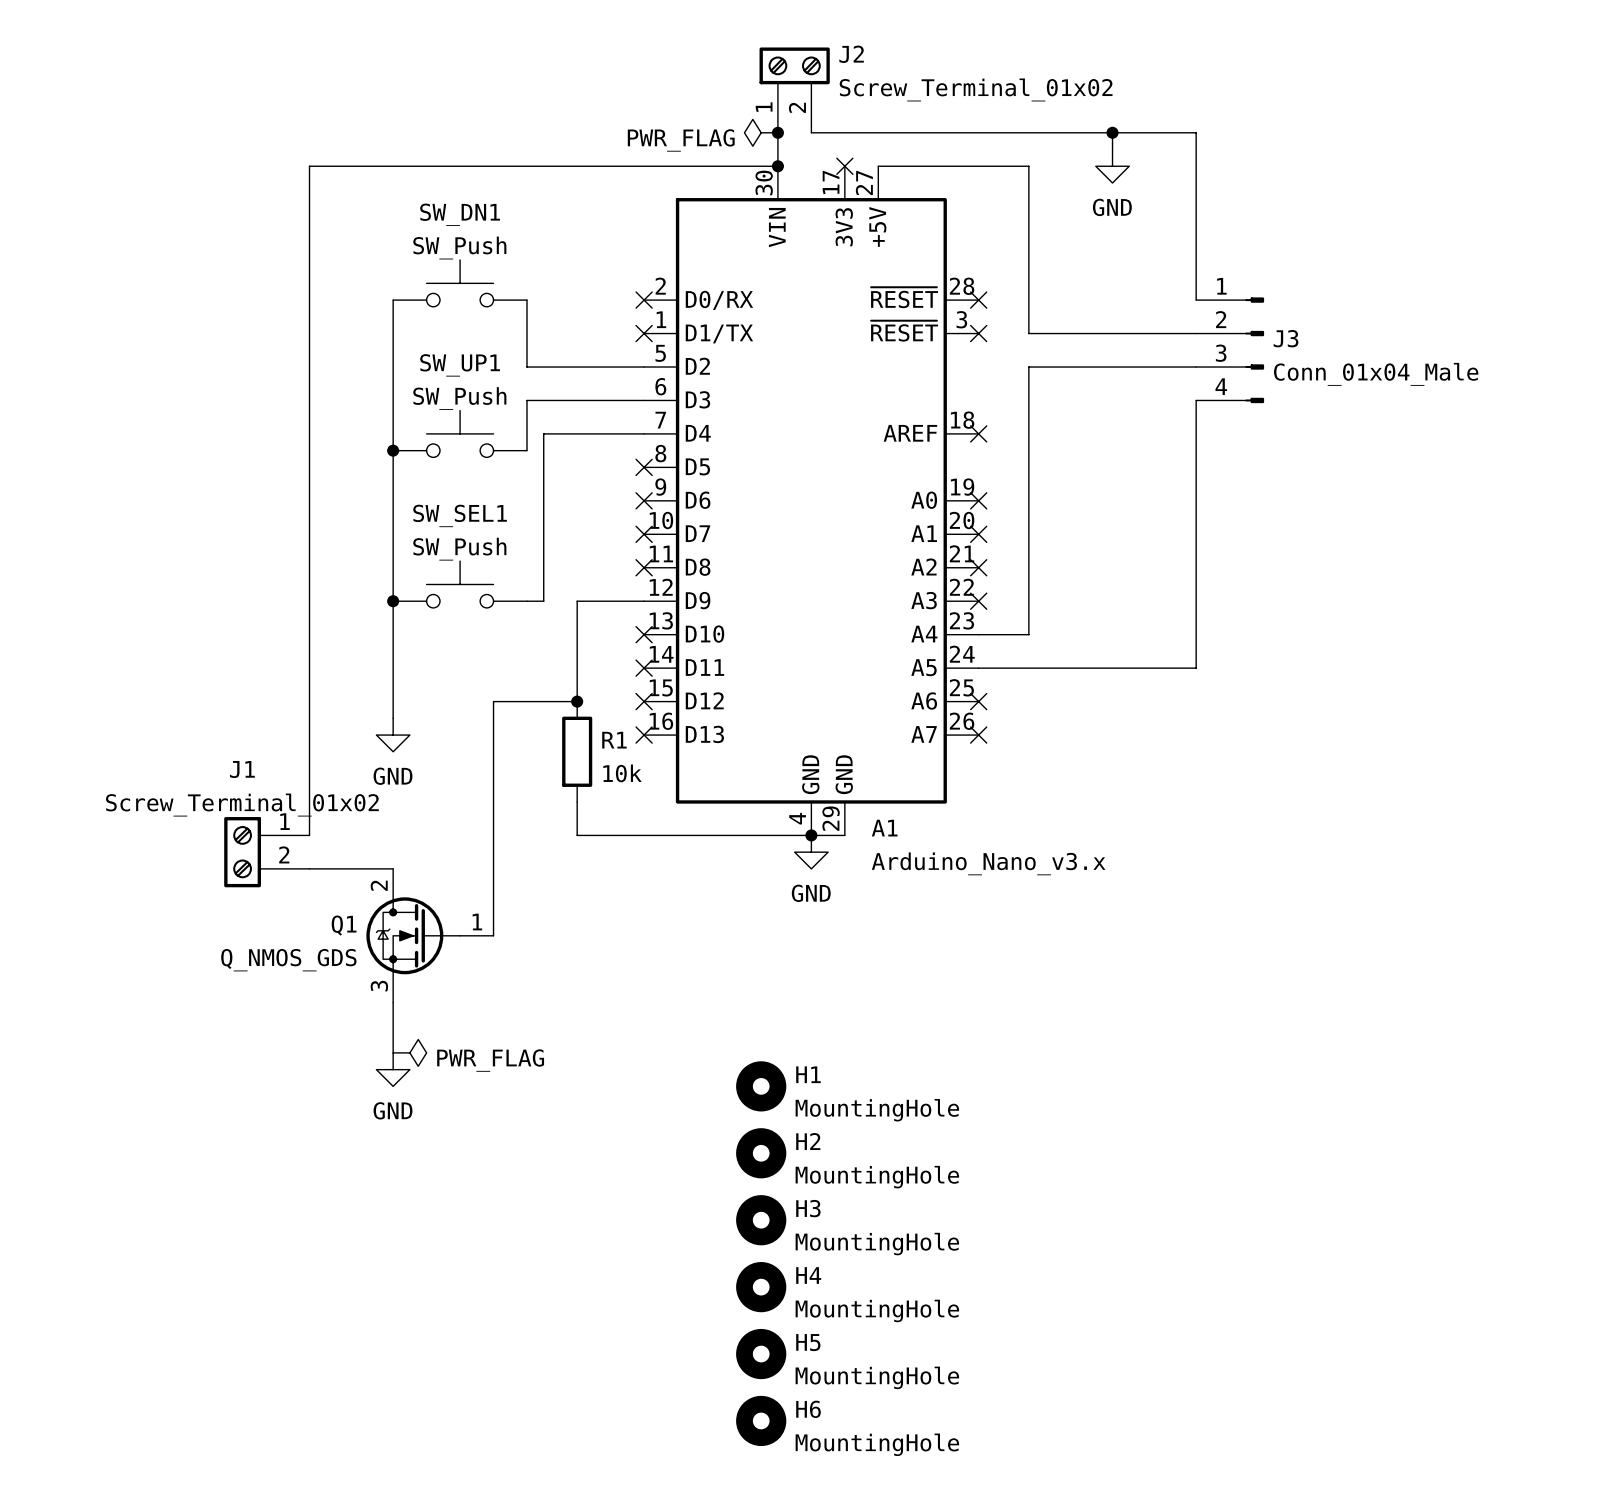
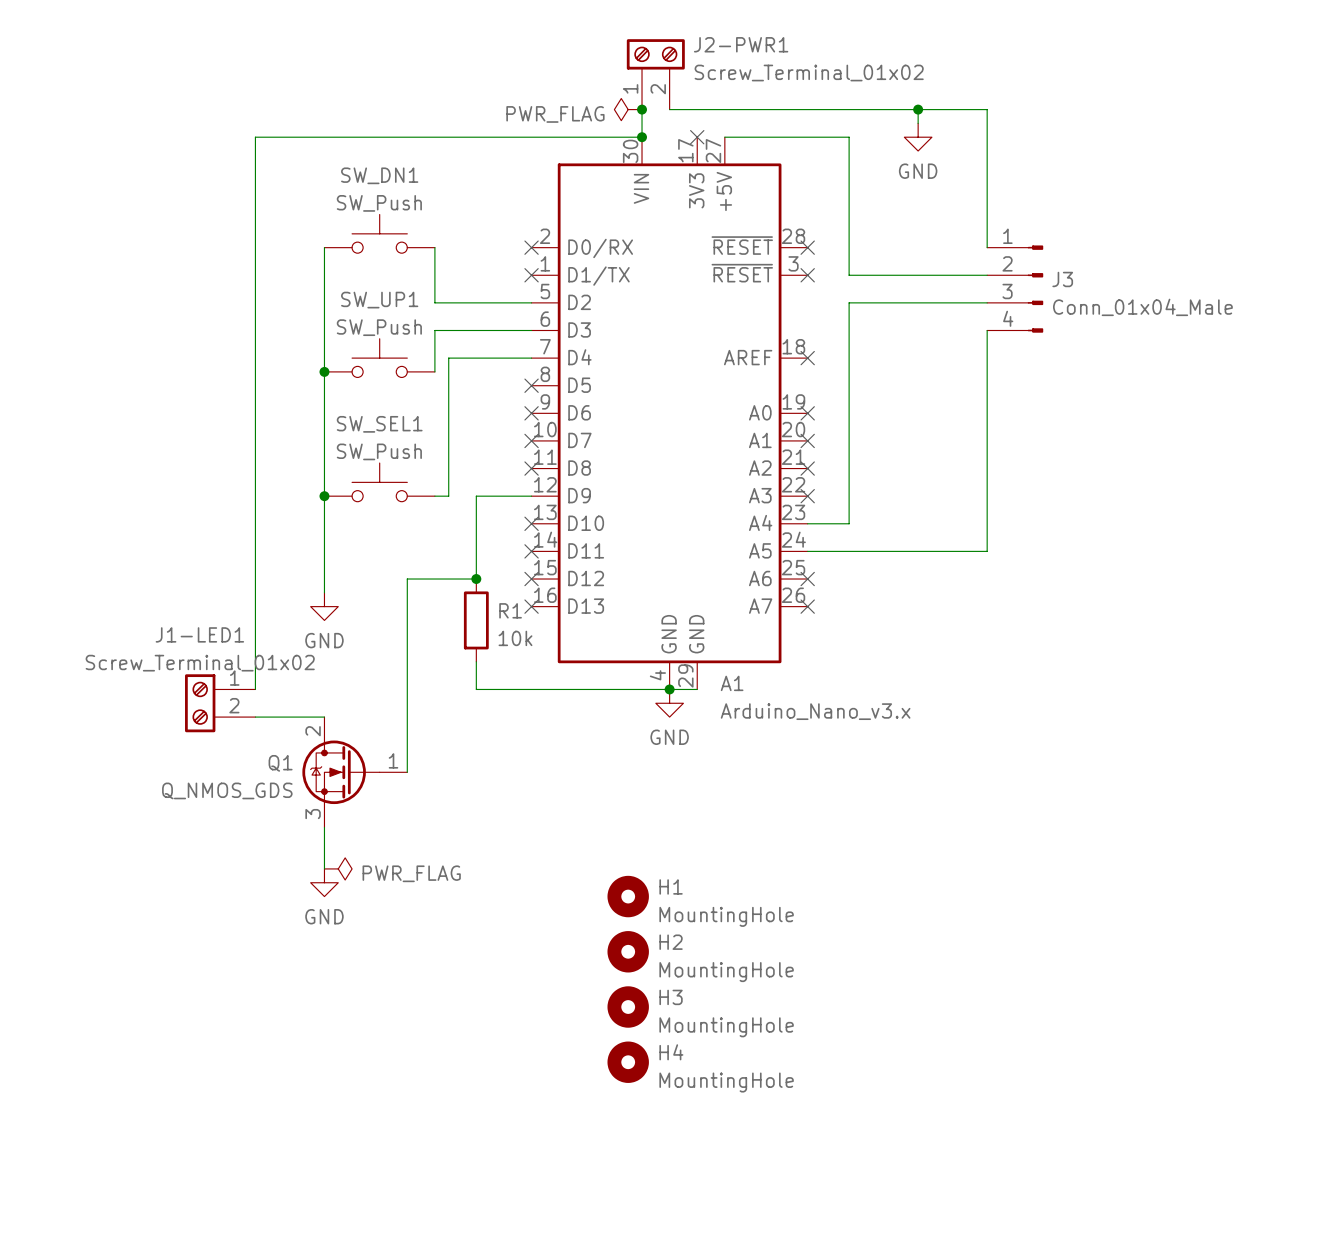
J2 name: J2 (851, 54) -> J2-PWR1 (741, 44)
J1 name: J1 (242, 769) -> J1-LED1 (199, 634)
H5: MountingHole (761, 1354) -> none
H6: MountingHole (761, 1420) -> none

